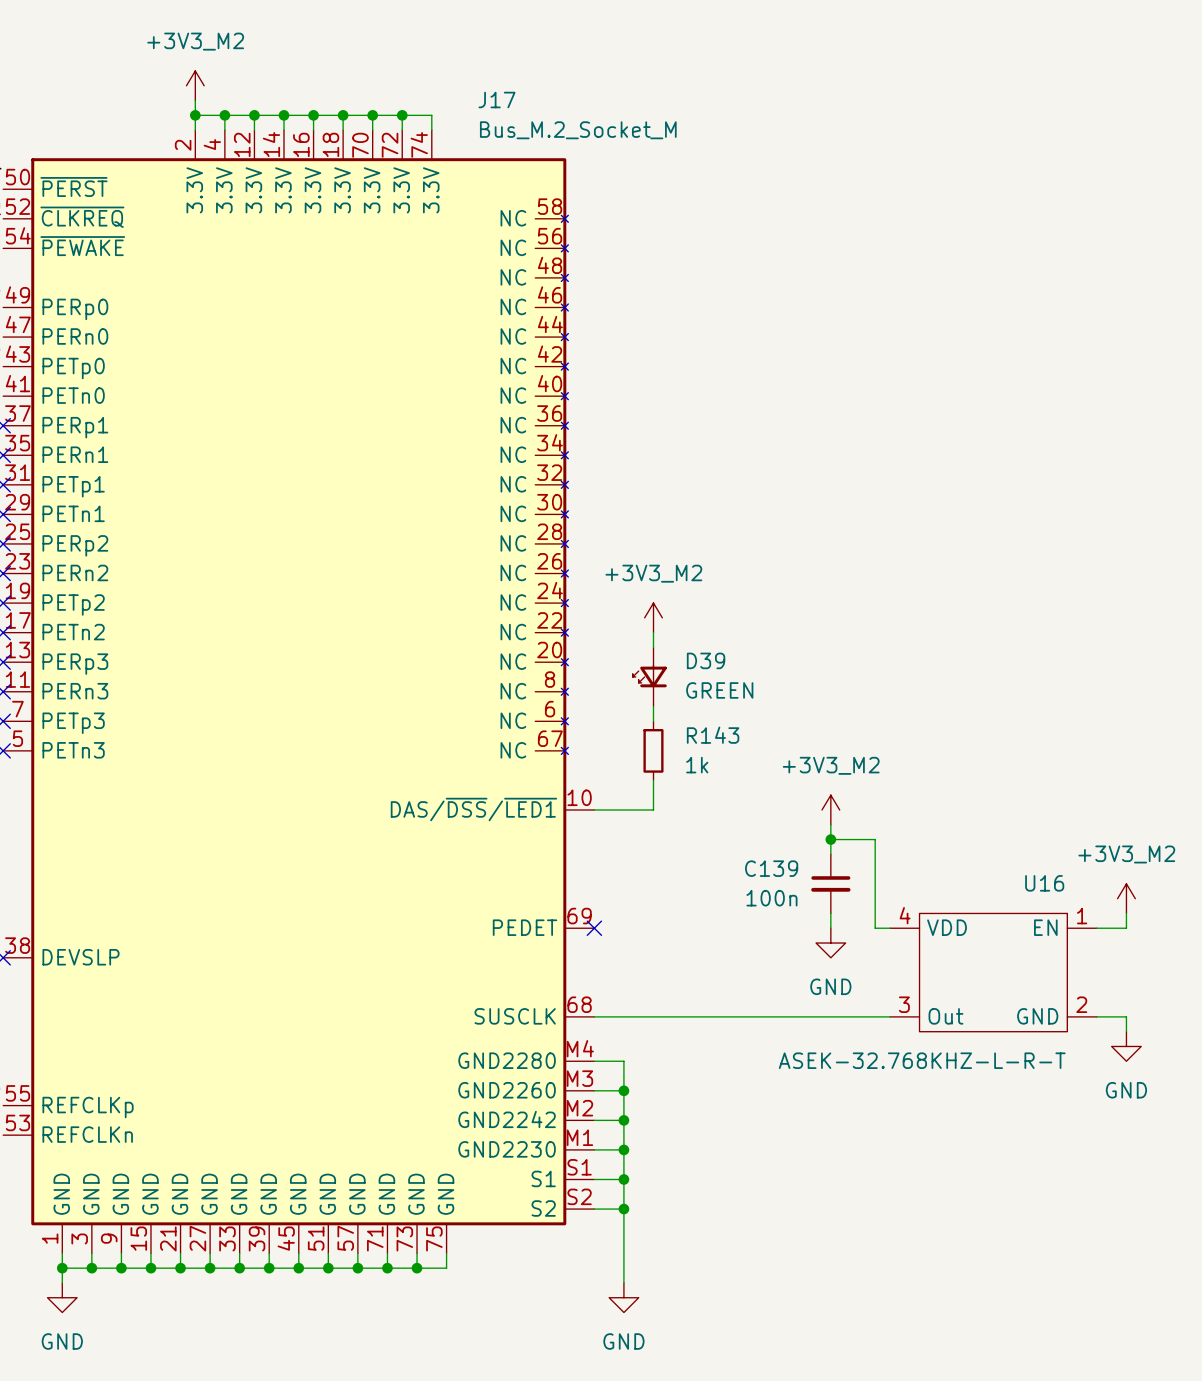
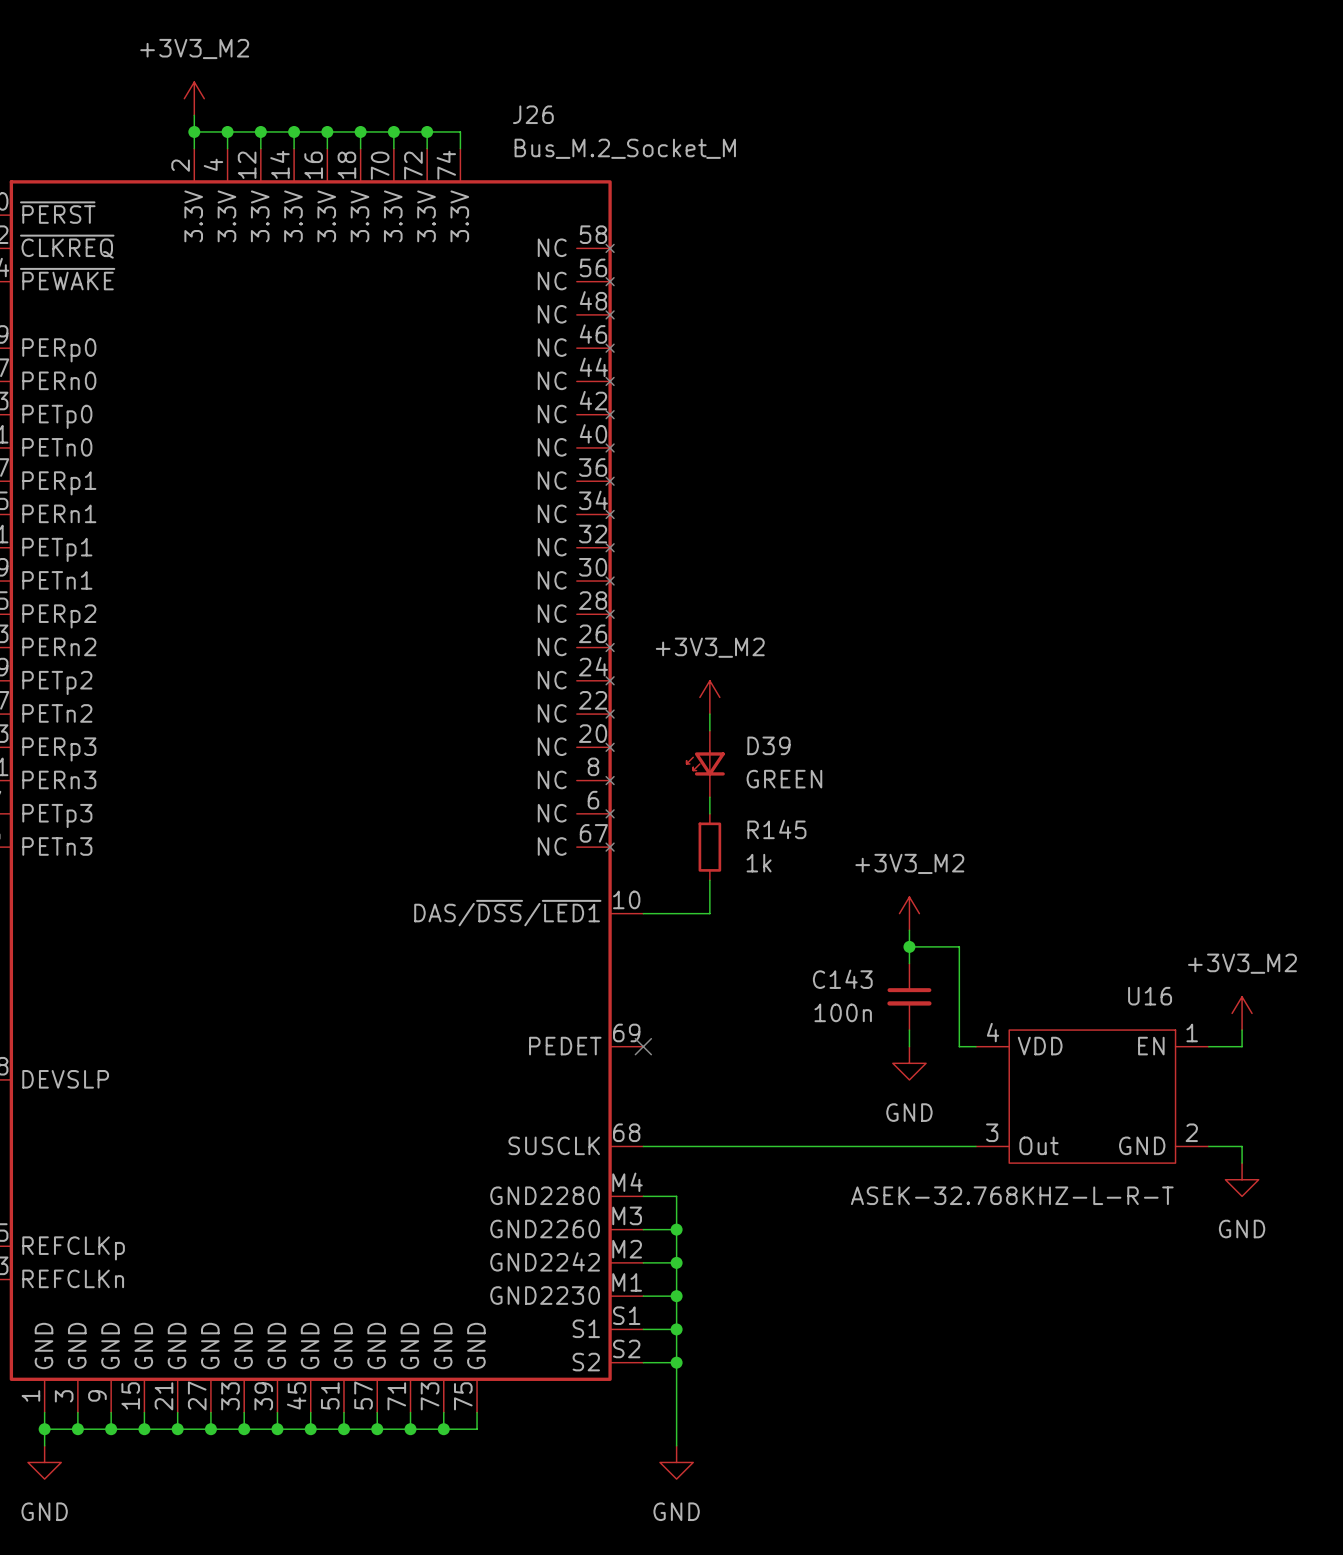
J17 name: J17 (497, 100) -> J26 (533, 114)
R143 name: R143 (713, 735) -> R145 (776, 829)
C139 name: C139 (771, 868) -> C143 (842, 979)

